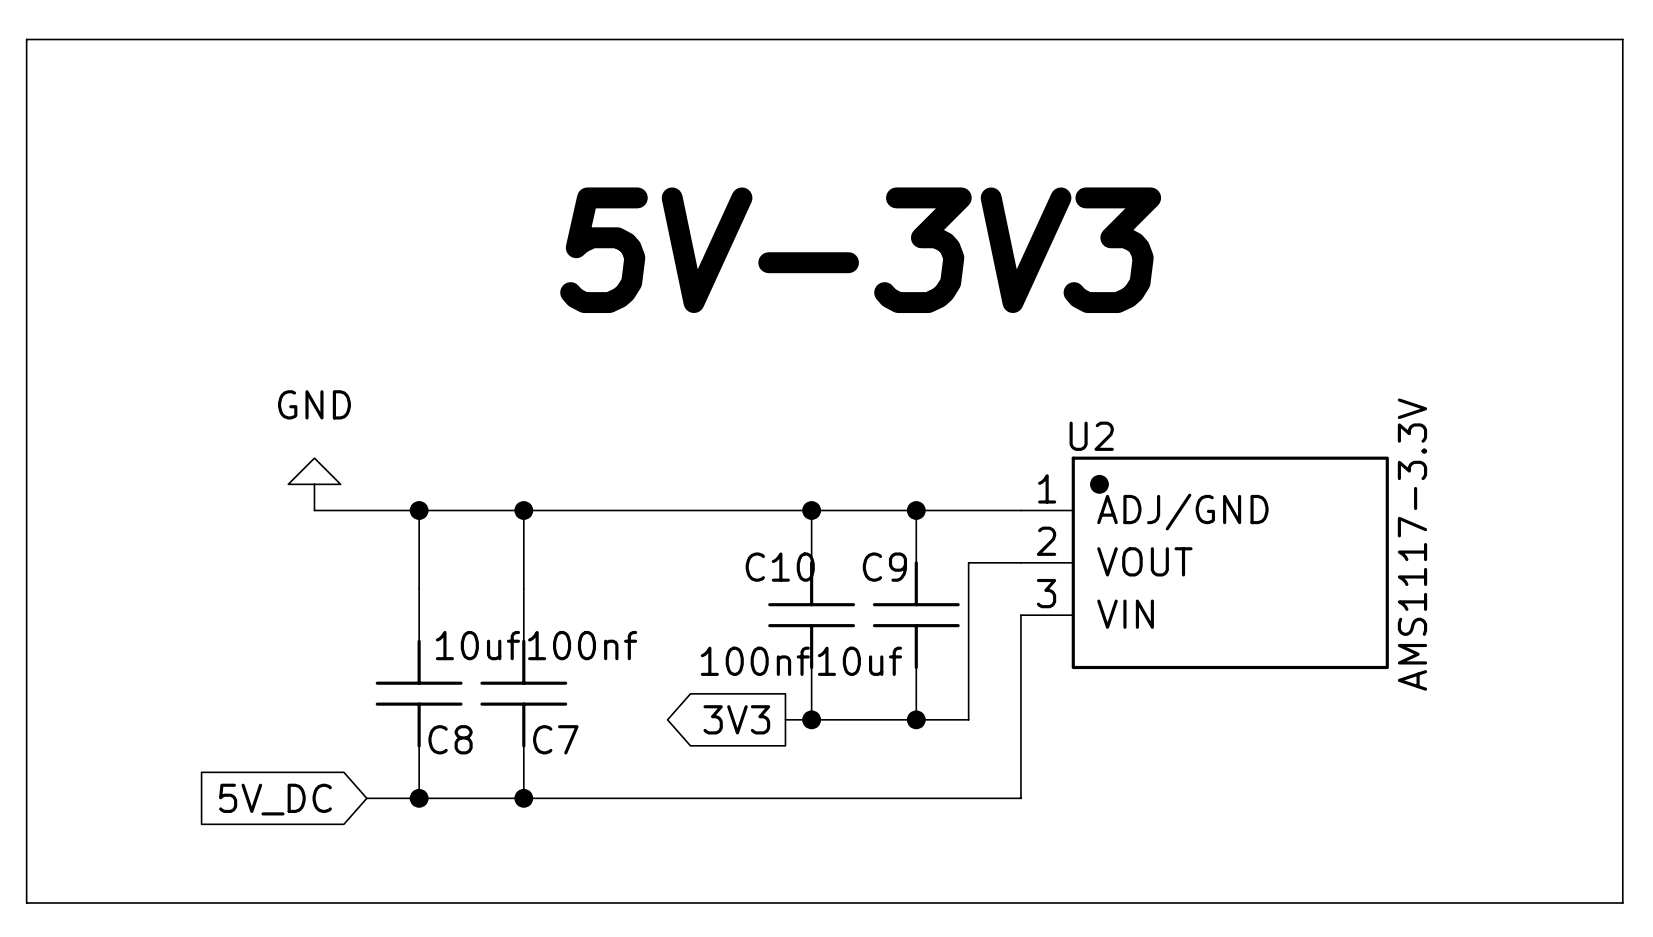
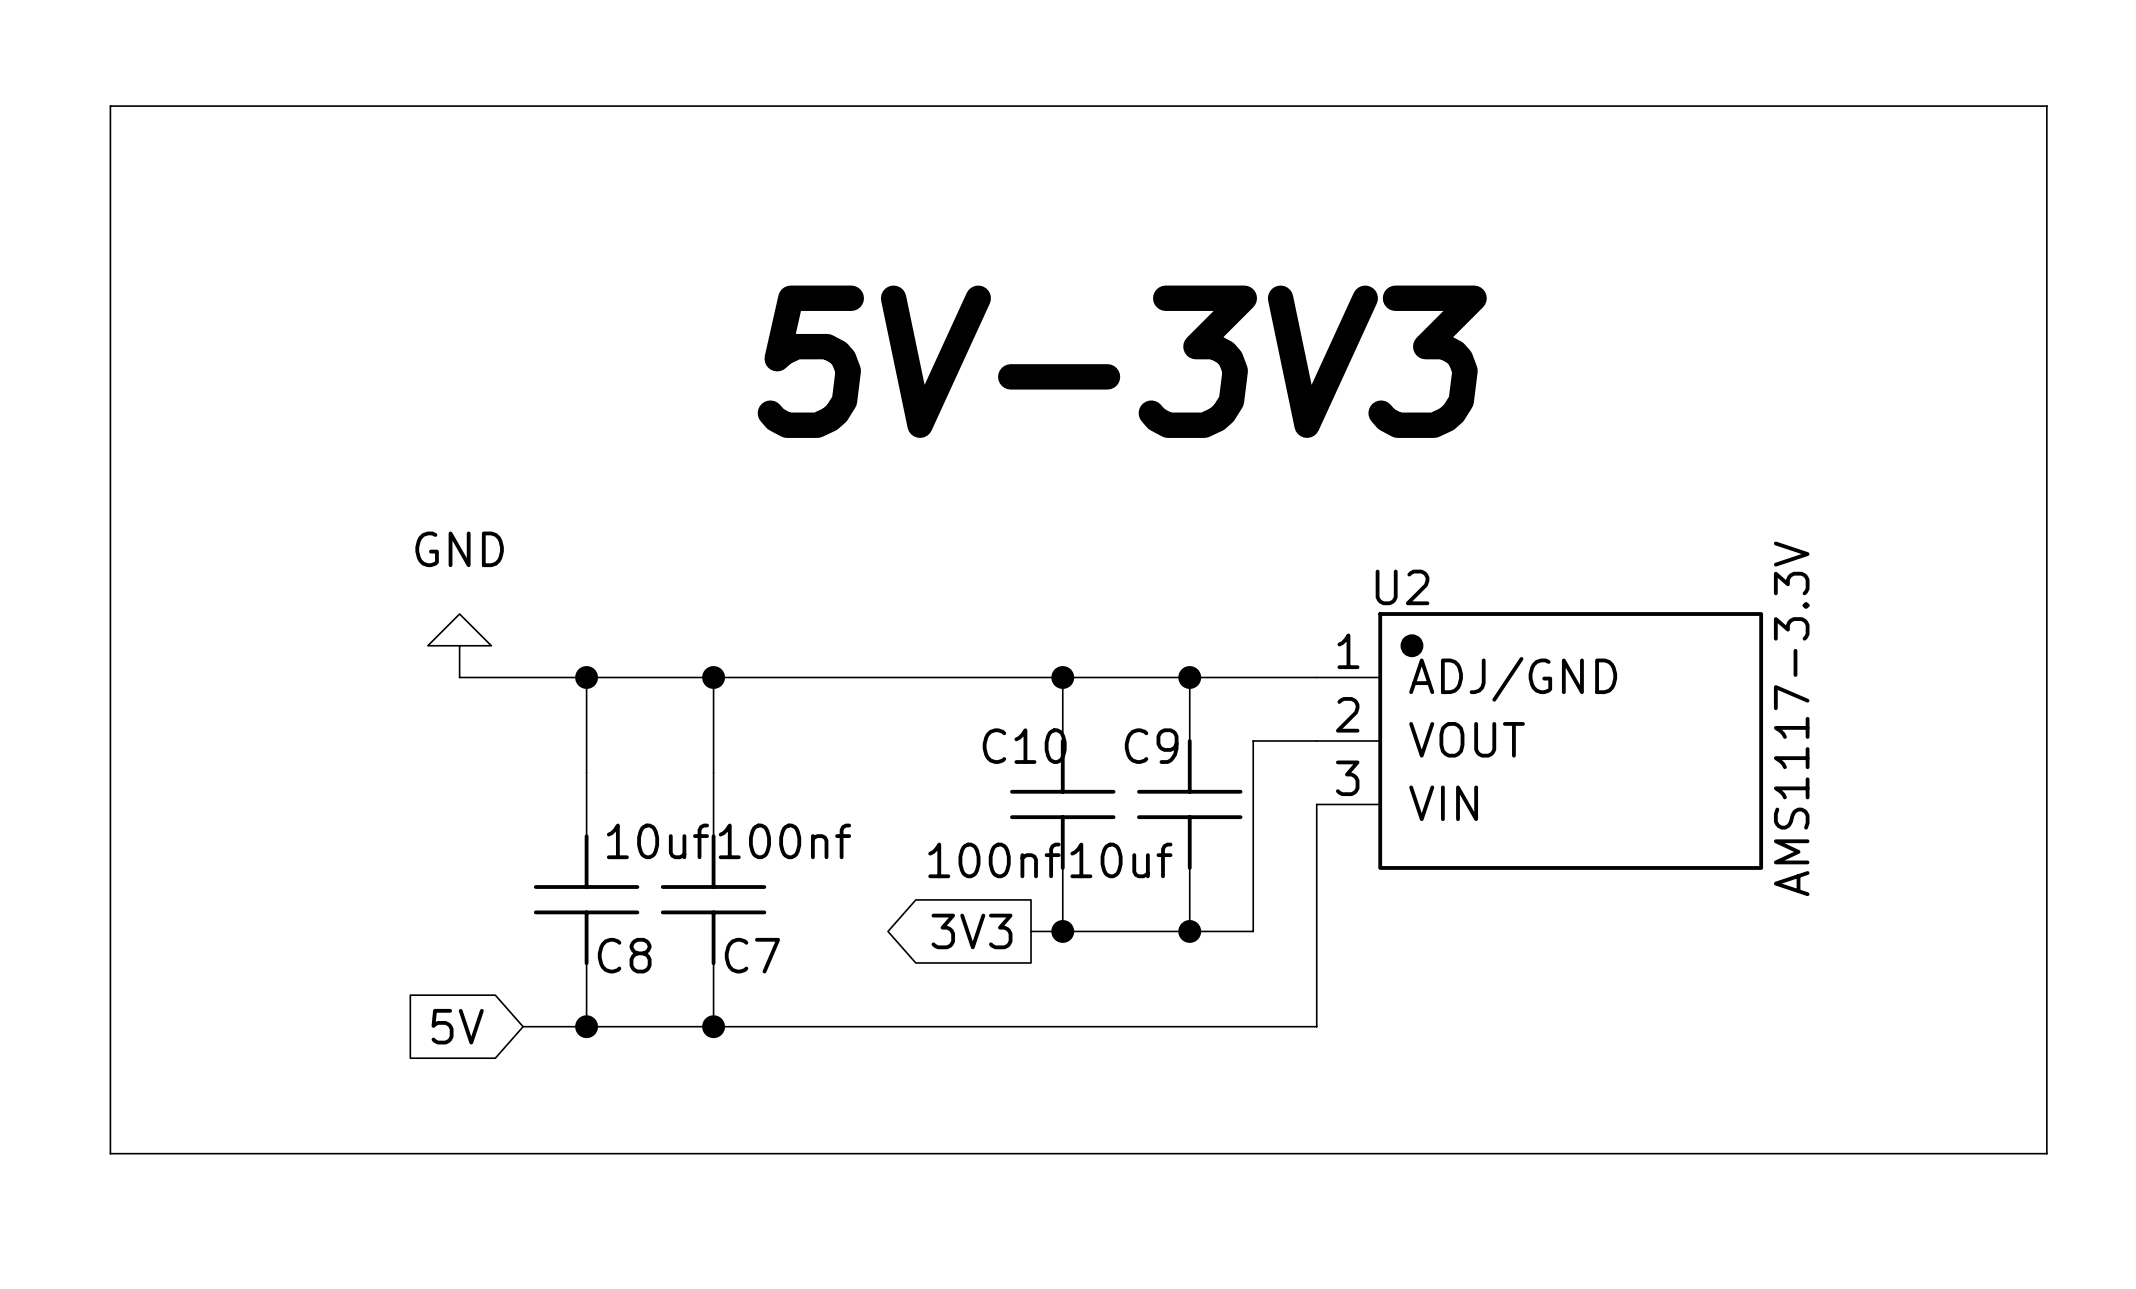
global label: 5V_DC (275, 799) -> 5V (457, 1026)

